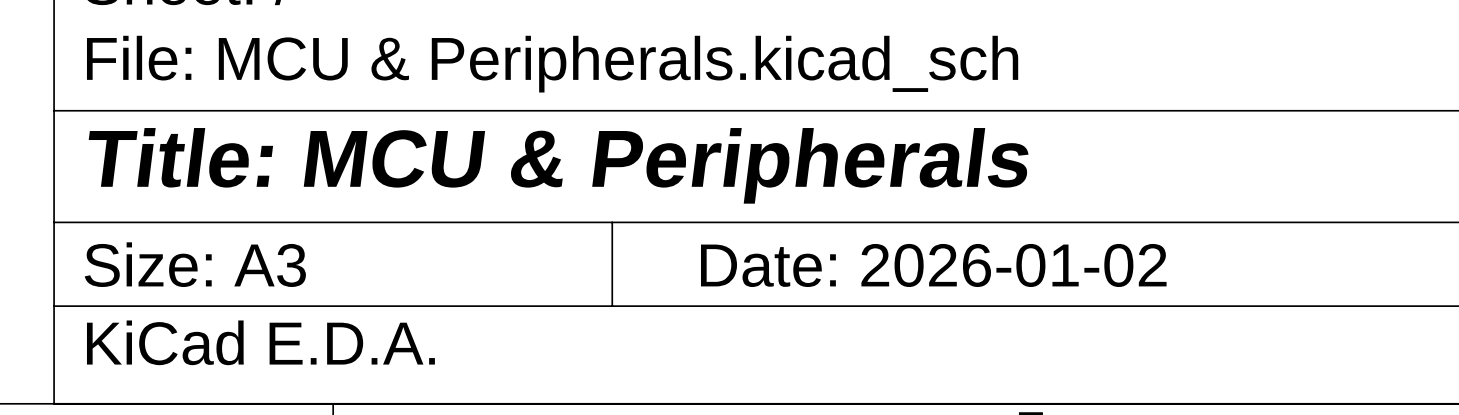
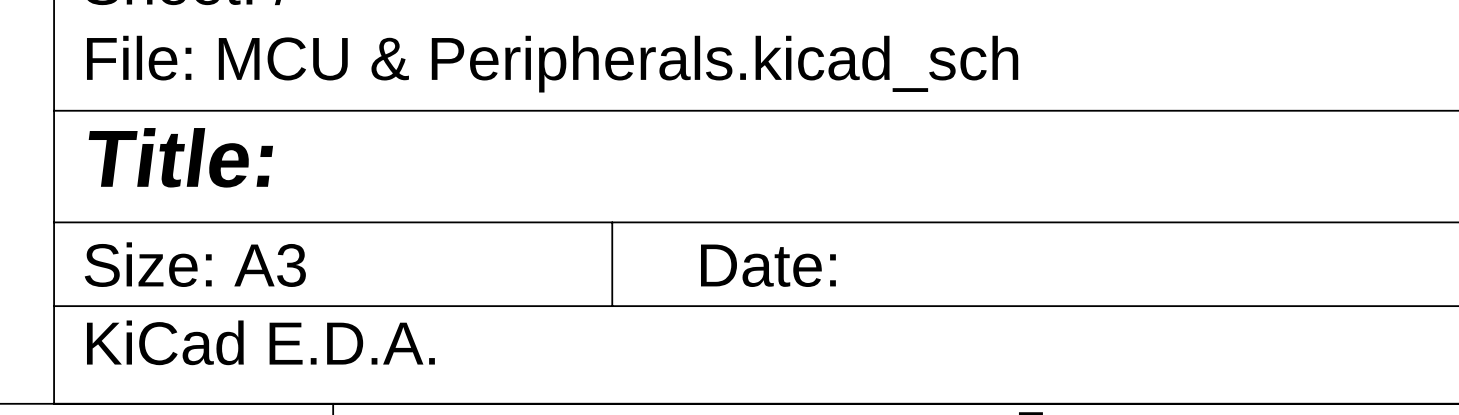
title block: Title: MCU & Peripherals (558, 165) -> Title: (180, 157)
title block: Date: 2026-01-02 (933, 265) -> Date: (768, 265)

